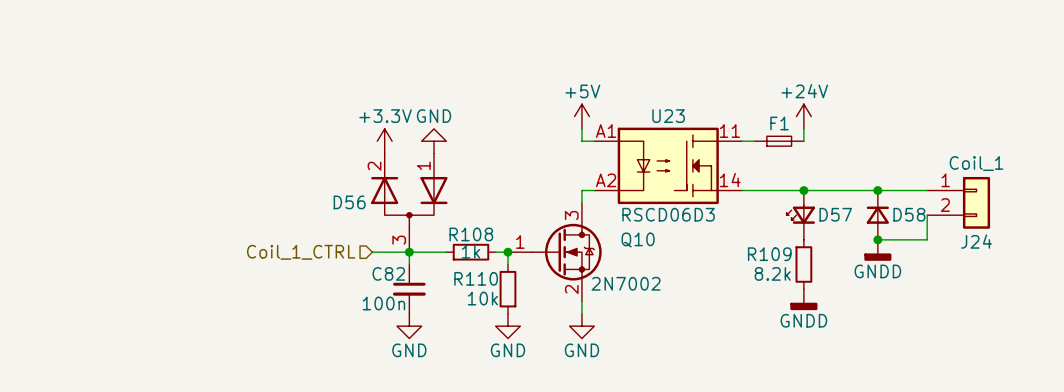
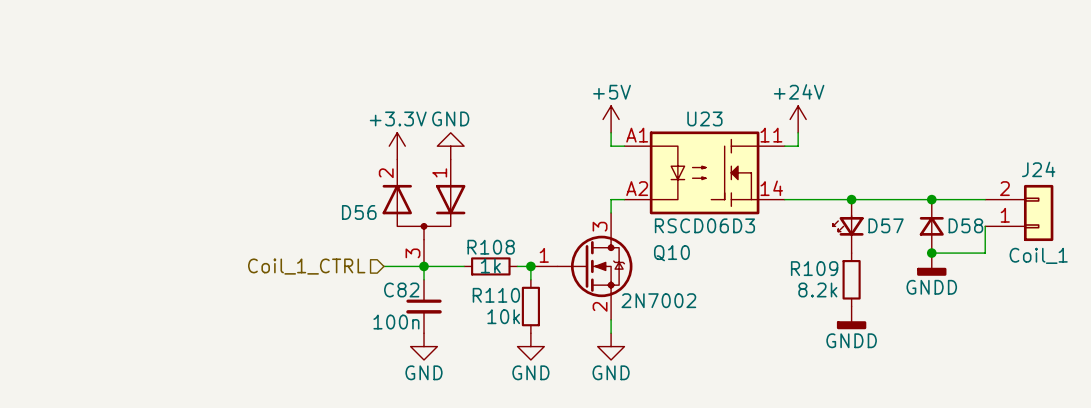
power symbol position: +24V (803, 116) -> +24V (798, 119)
wire: (803, 128) (803, 141) -> (798, 132) (798, 146)
F1: (779, 141) -> none
J24 flip: as is (976, 202) -> up-down (1038, 212)

